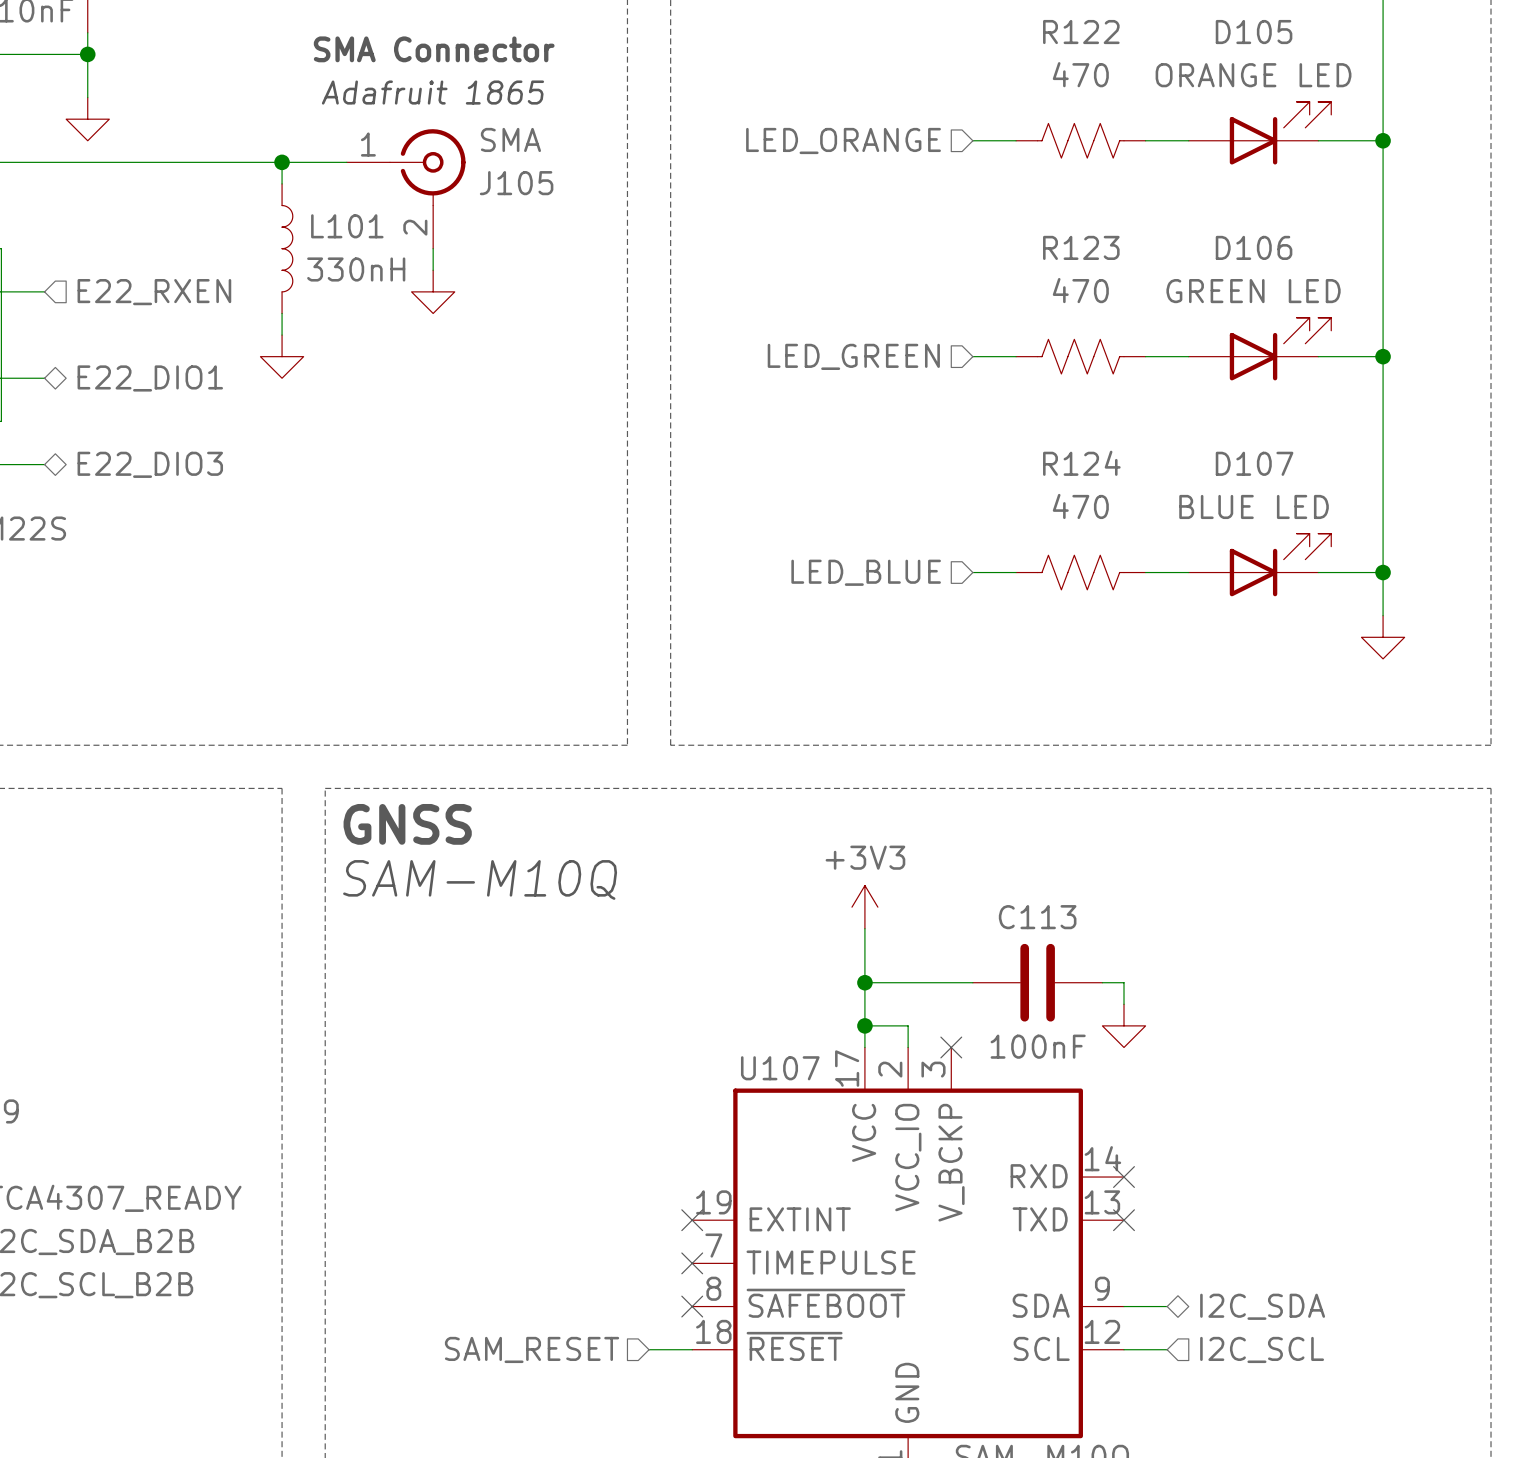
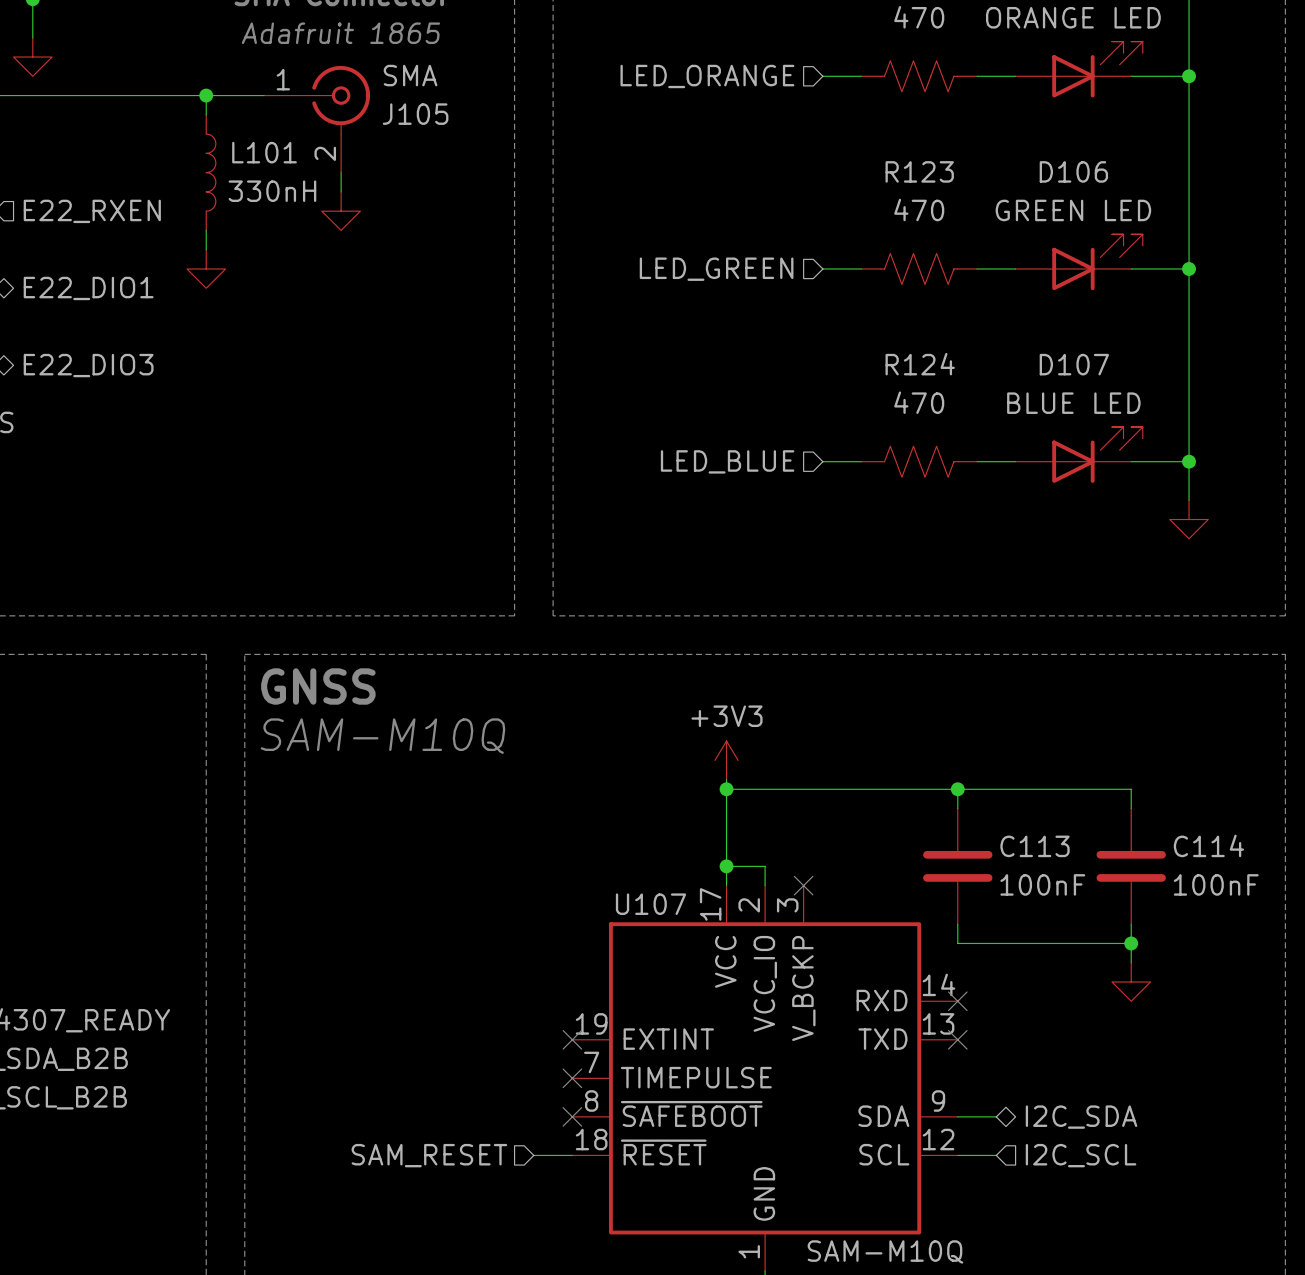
C113 name position: C113 (1037, 917) -> C113 (1035, 846)
wire: none -> (726, 789) (1131, 789) (1131, 808)
wire: none -> (957, 789) (957, 808)
junction: none -> (957, 789)
wire: (864, 982) (972, 982) -> none
junction position: (864, 982) -> (726, 789)
C113 rotation: 0° (1037, 982) -> 90° clockwise (957, 866)
C113 position: (1037, 982) -> (957, 866)
wire: (1102, 982) (1123, 982) (1123, 1004) -> none
power symbol position: (1123, 1025) -> (1131, 981)
C114: none -> 100nF (1131, 866)
C113 value position: 100nF (1038, 1046) -> 100nF (1042, 884)
wire: none -> (957, 924) (957, 943) (1131, 943)
wire: none -> (1131, 924) (1131, 962)
junction: none -> (1131, 943)

